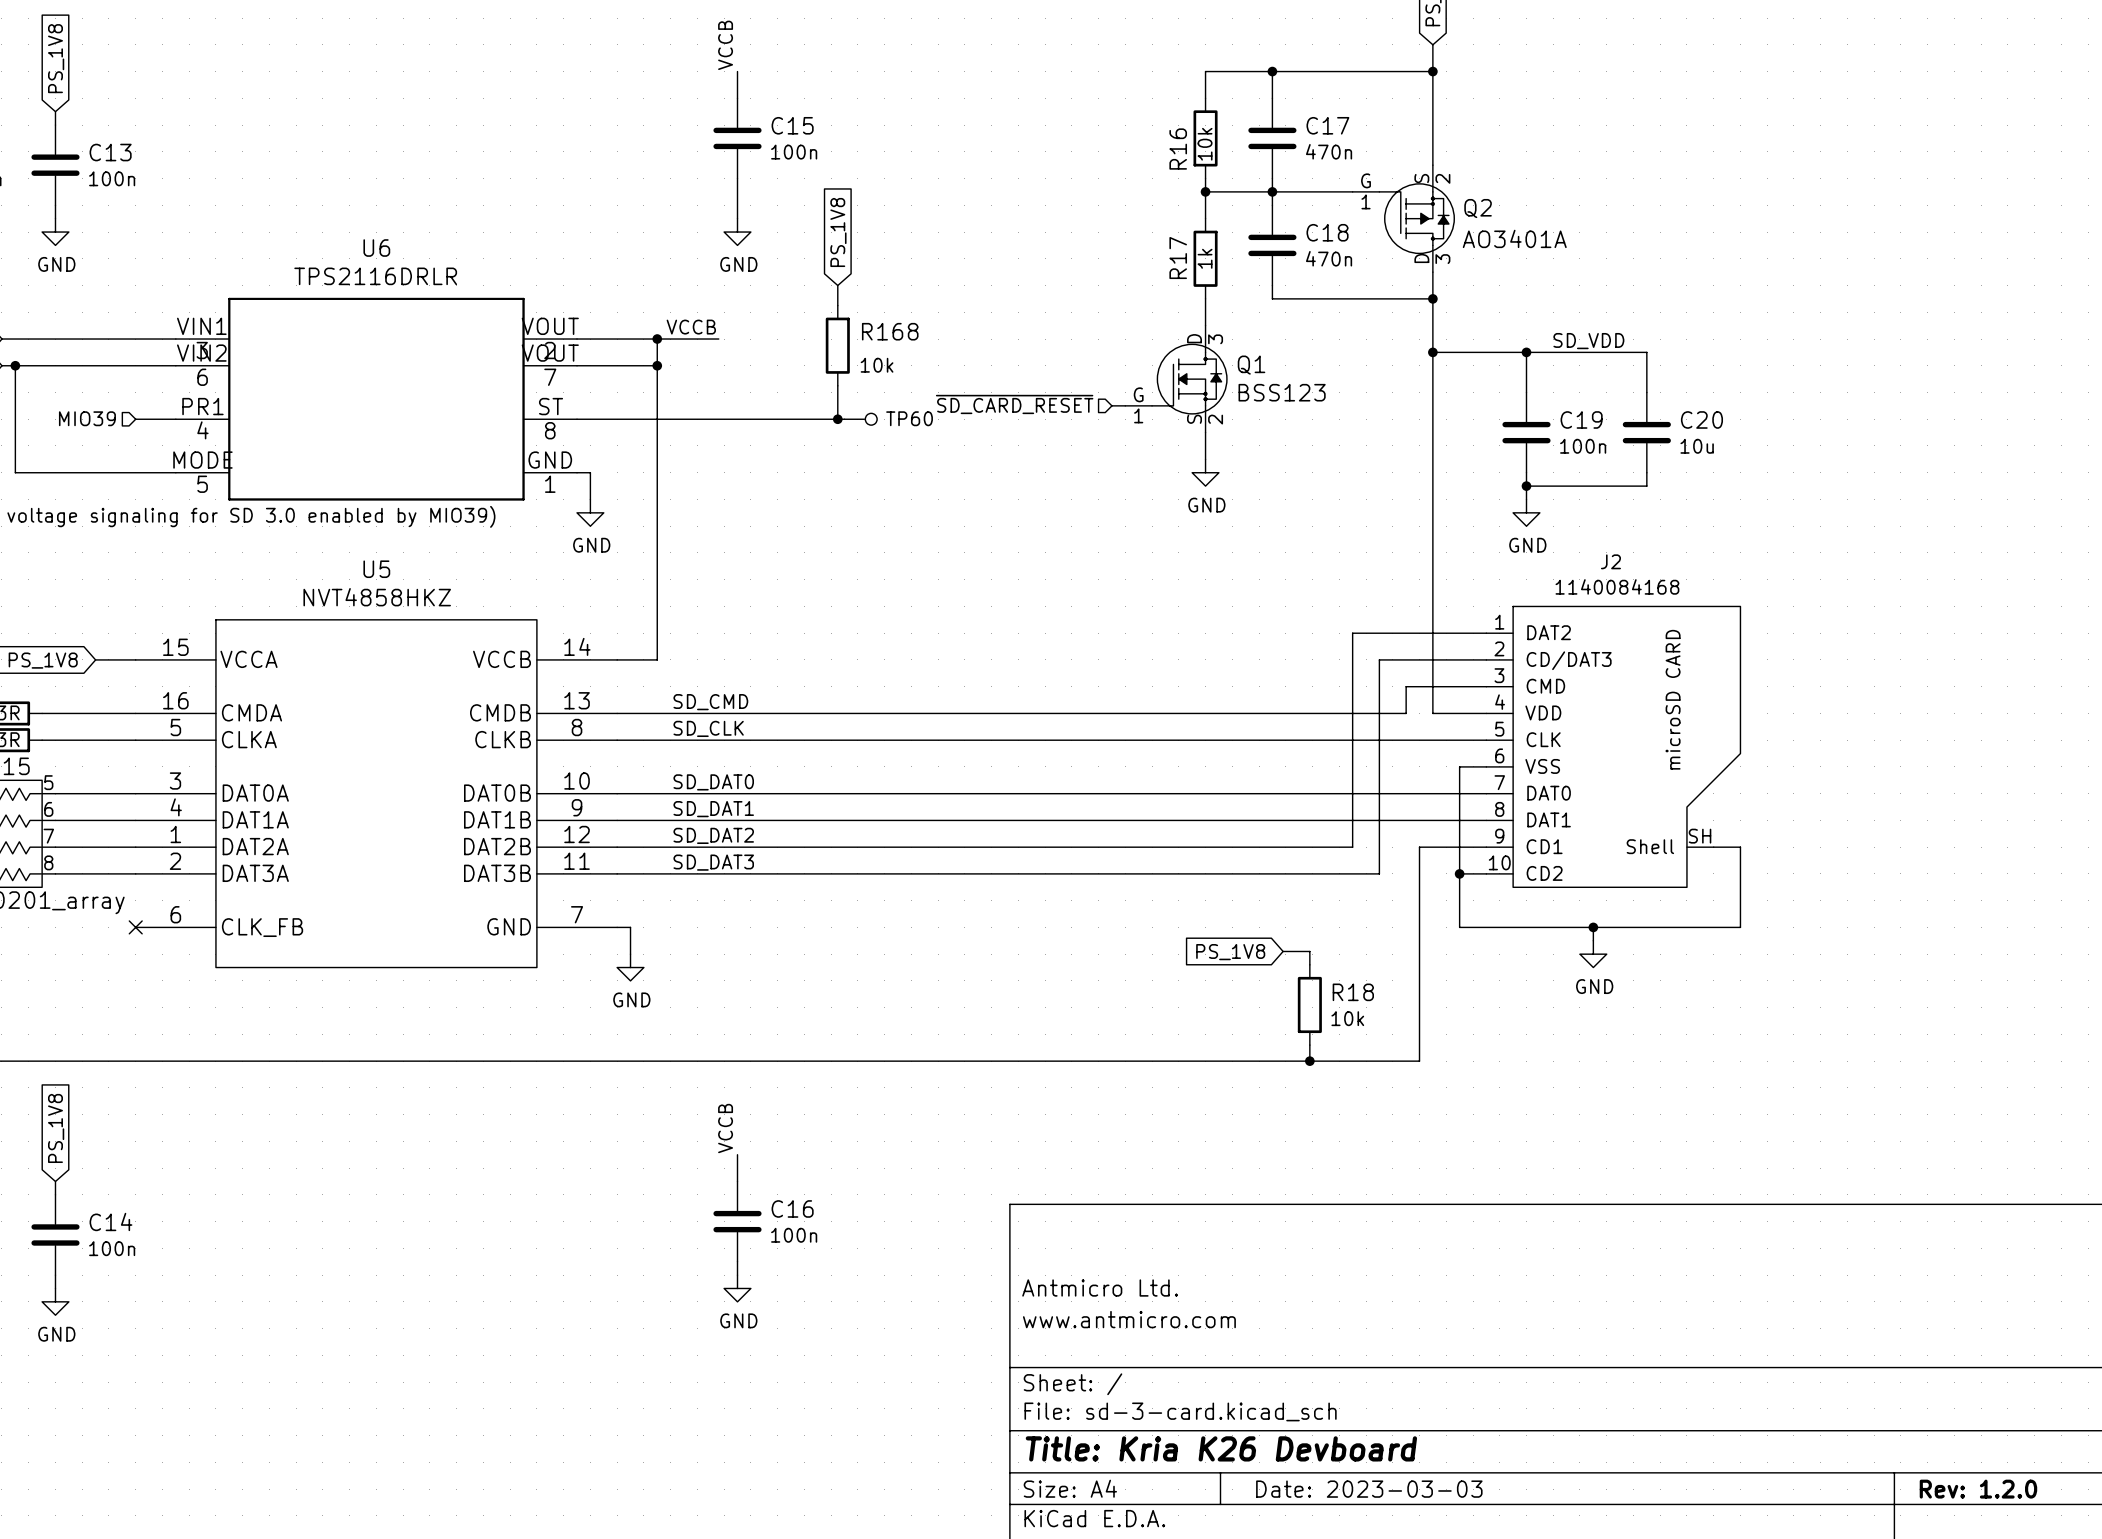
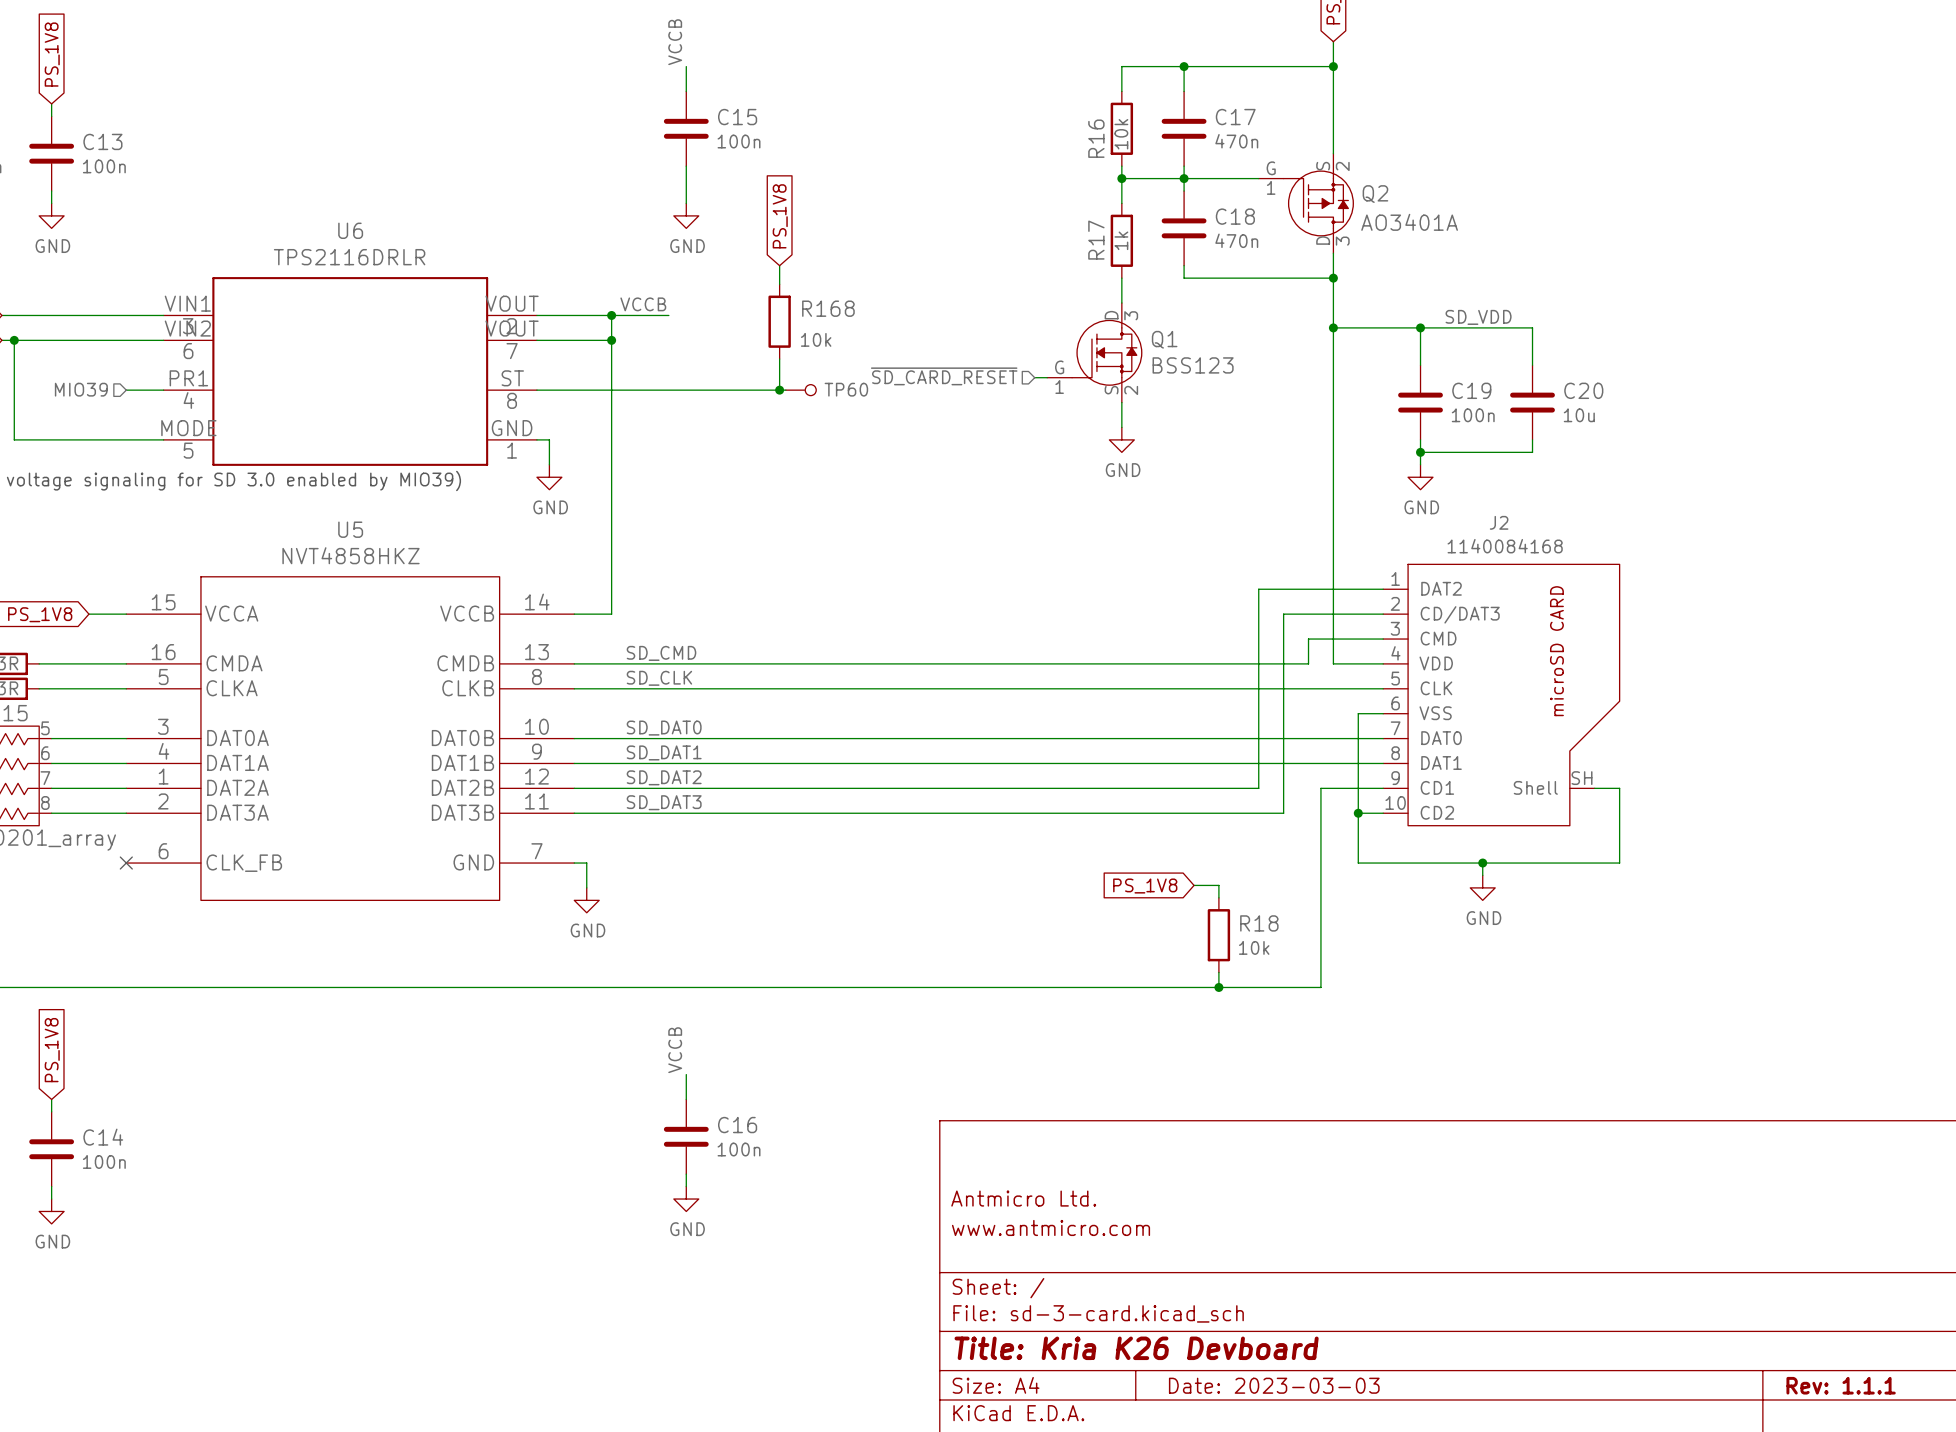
title block: Rev: 1.2.0 (1978, 1489) -> Rev: 1.1.1 (1841, 1385)

